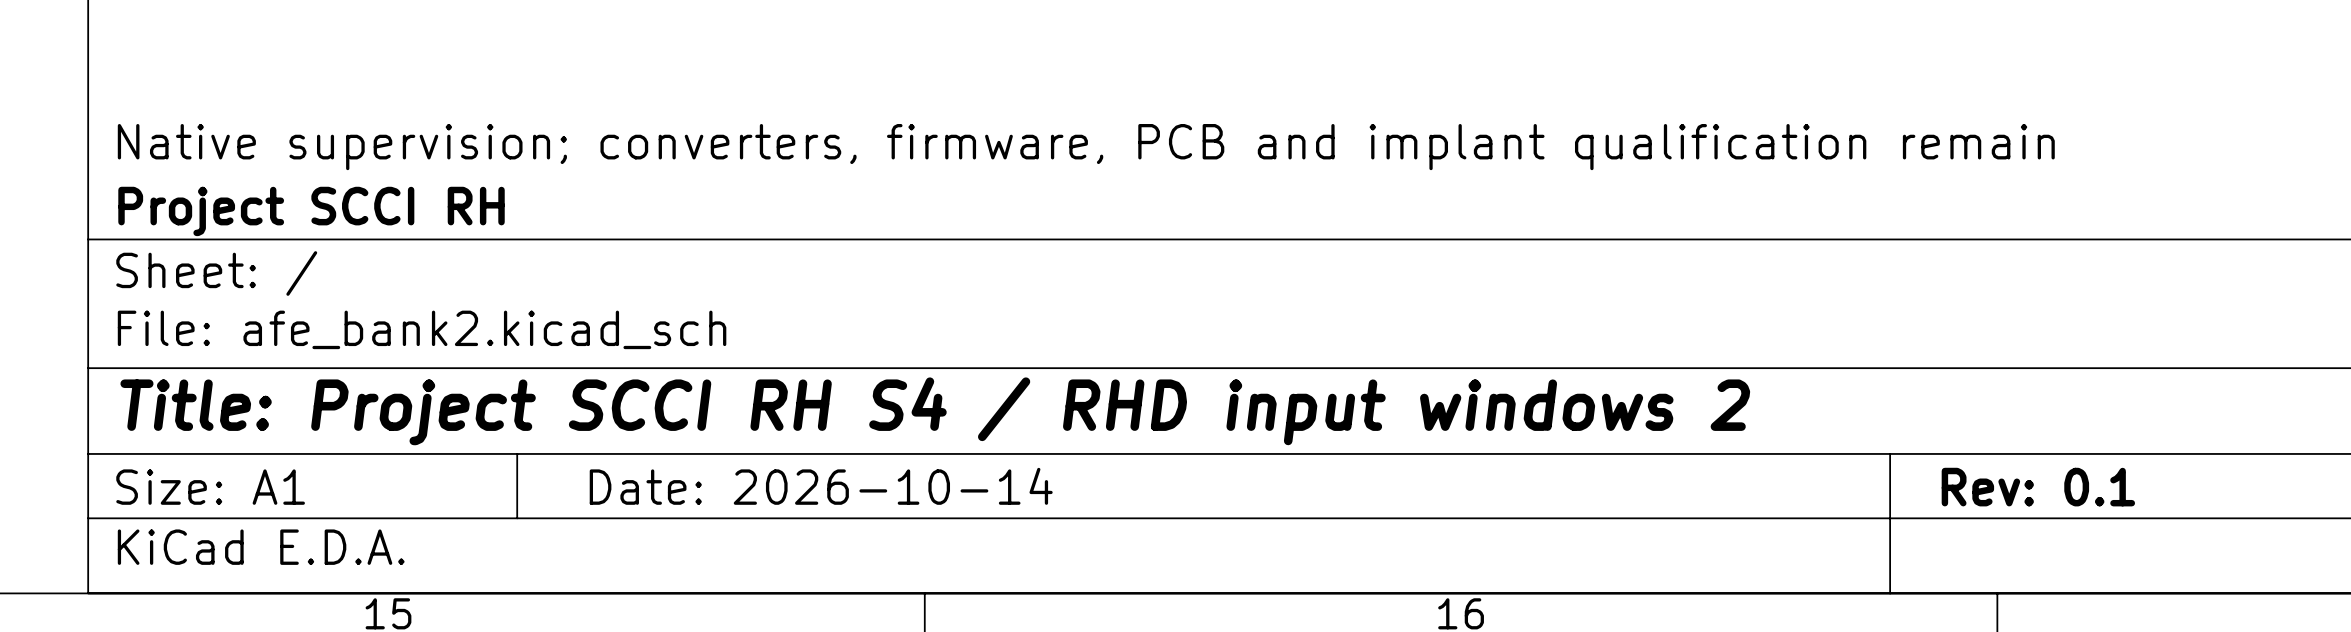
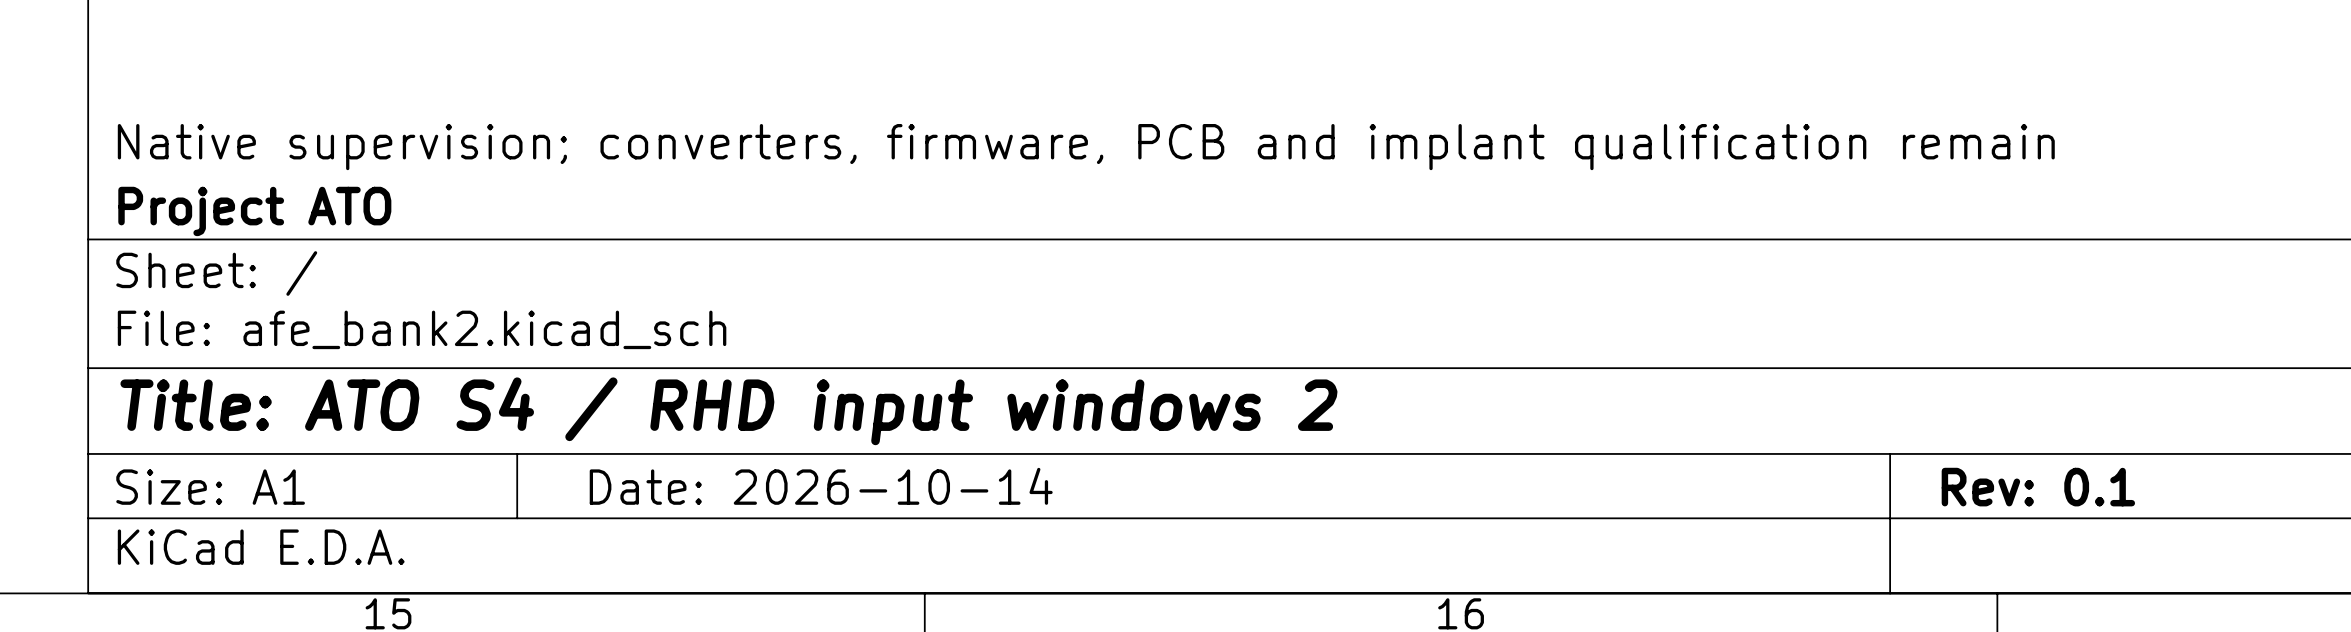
title block: Project SCCI RH (311, 211) -> Project ATO (254, 211)
title block: Title: Project SCCI RH S4 / RHD input windows 2 (935, 411) -> Title: ATO S4 / RHD input windows 2 (728, 411)

